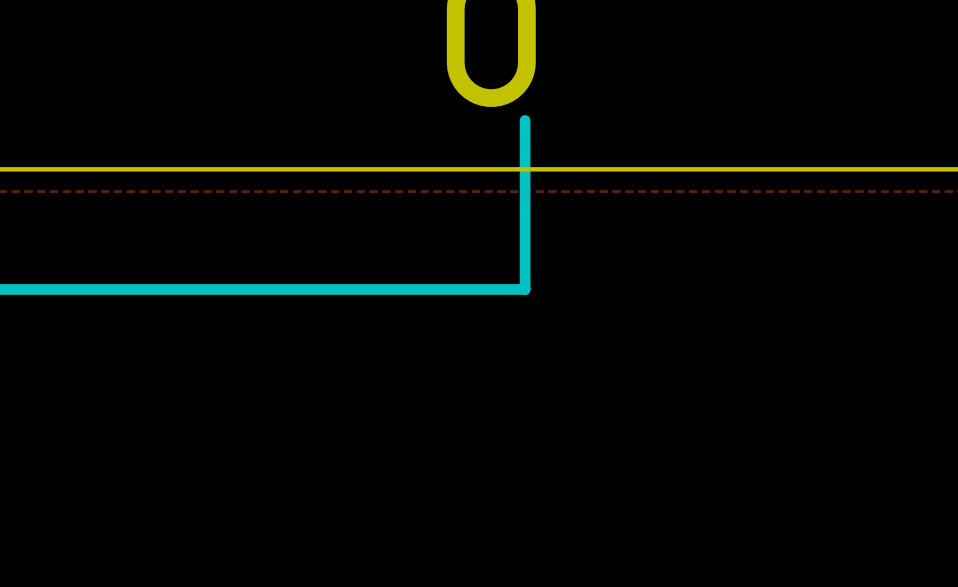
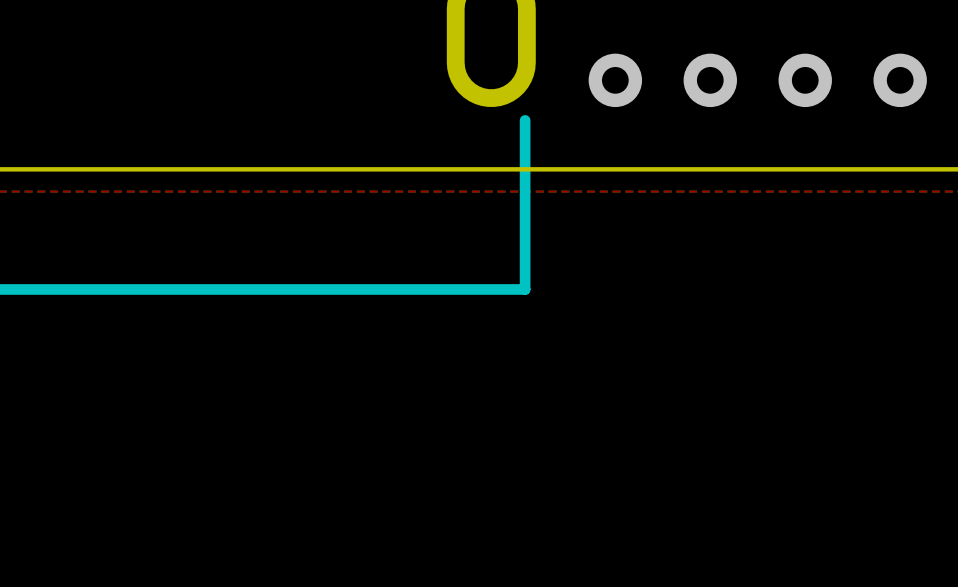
via: none -> (615, 80)
via: none -> (710, 80)
via: none -> (805, 80)
via: none -> (900, 80)

